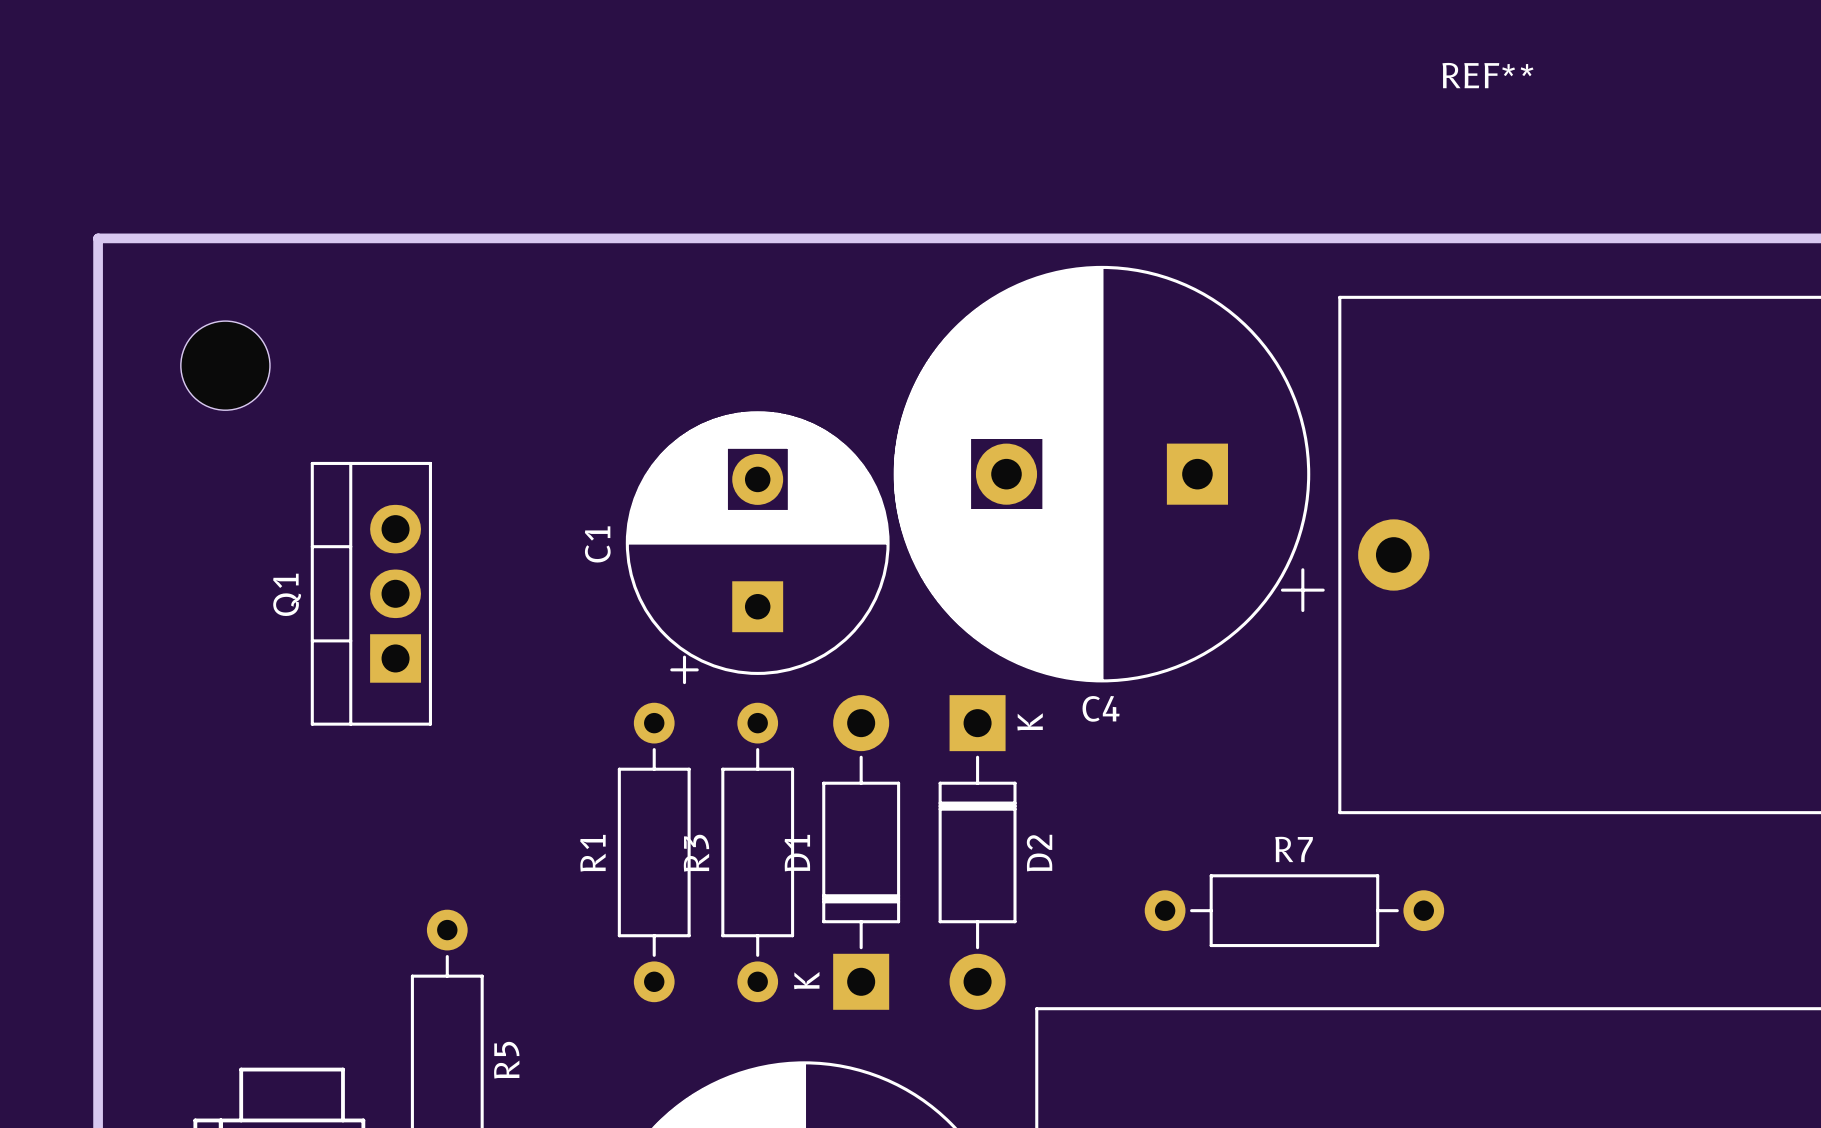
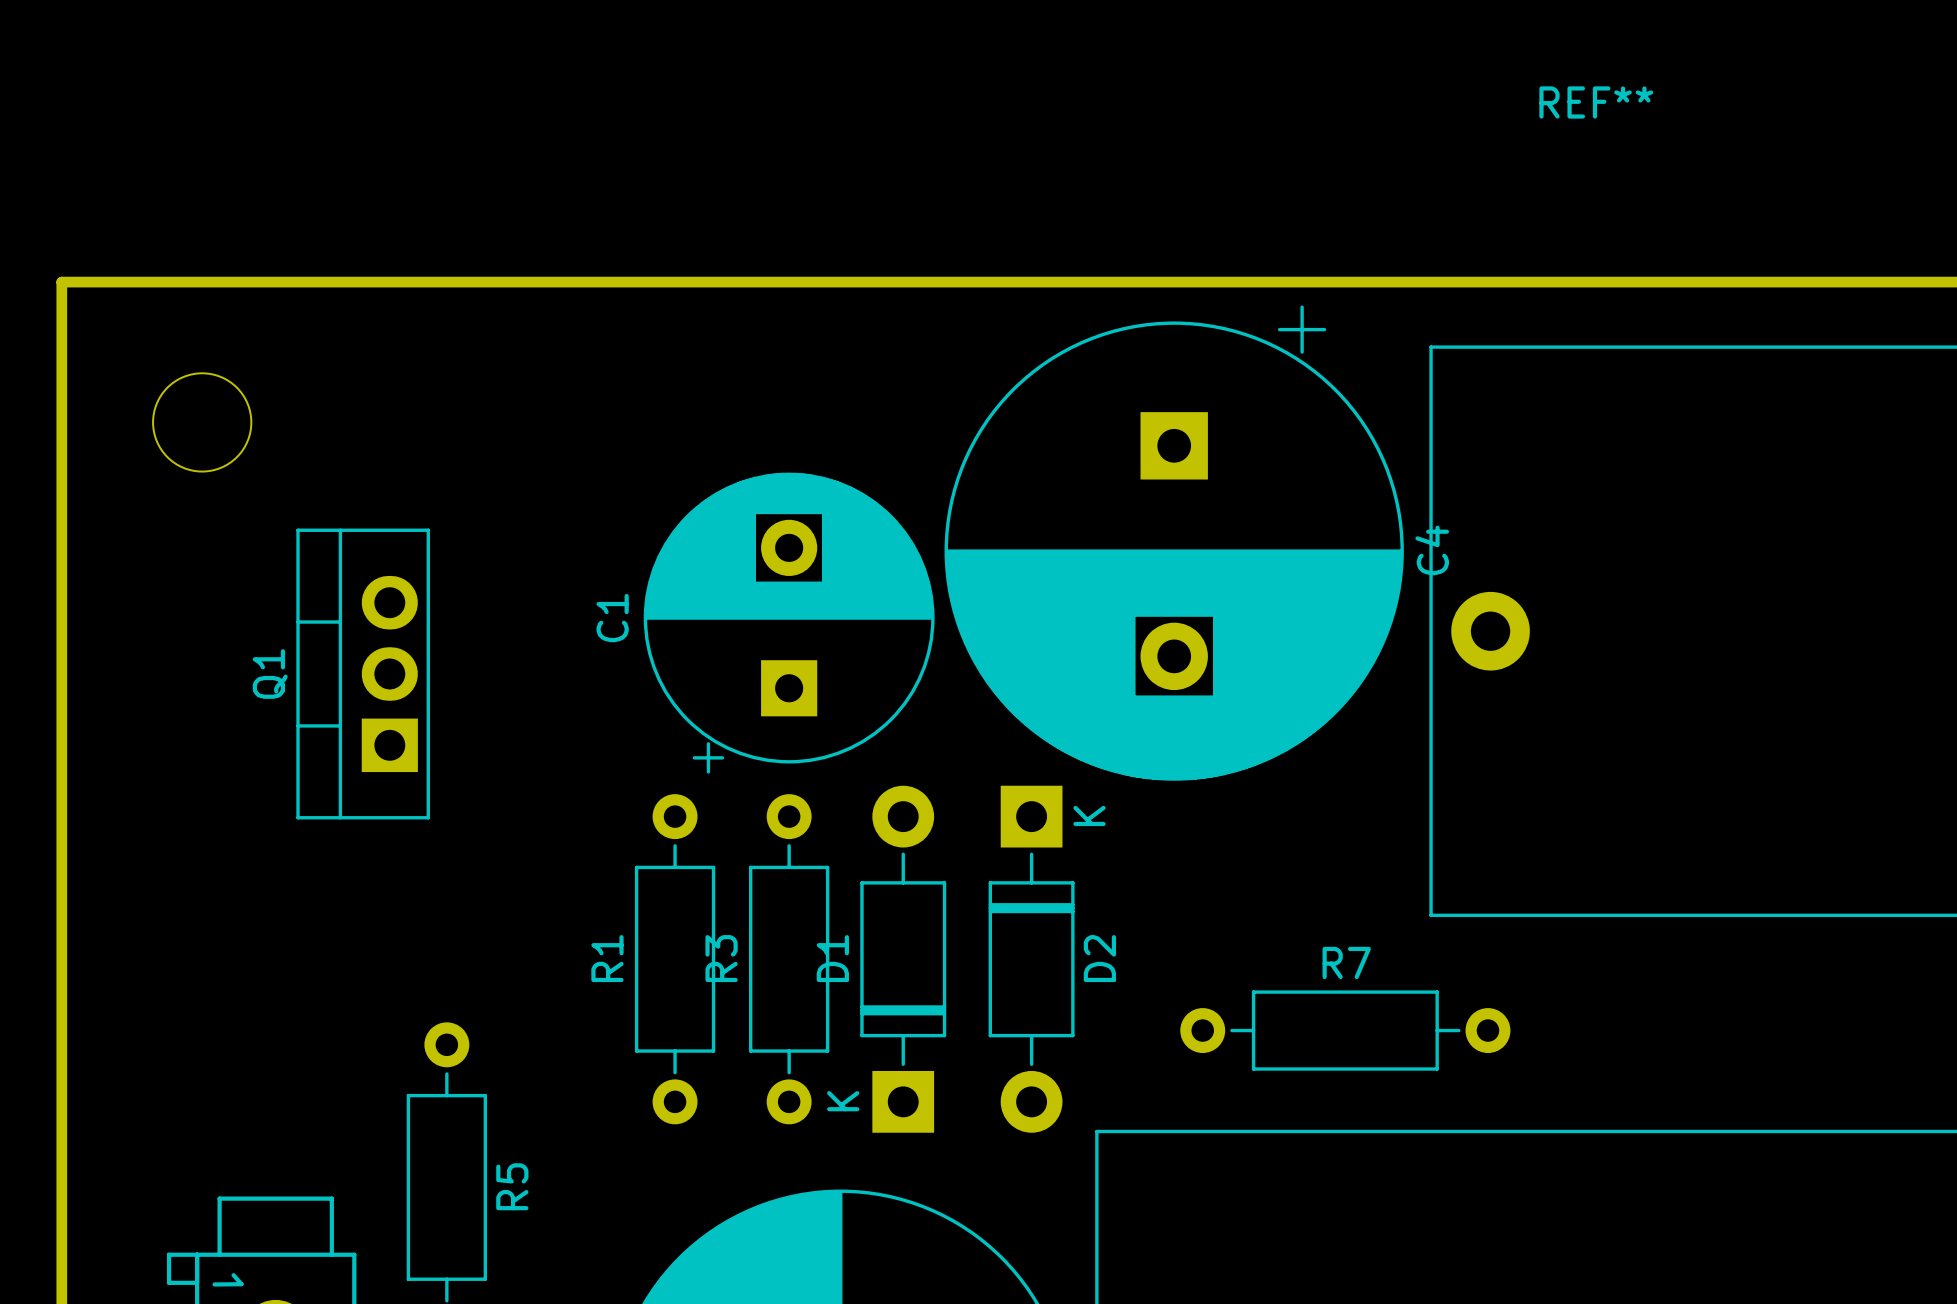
C4 rotation: 0° (1109, 474) -> 90° counterclockwise (1174, 543)
R7 position: (1294, 910) -> (1345, 1030)

